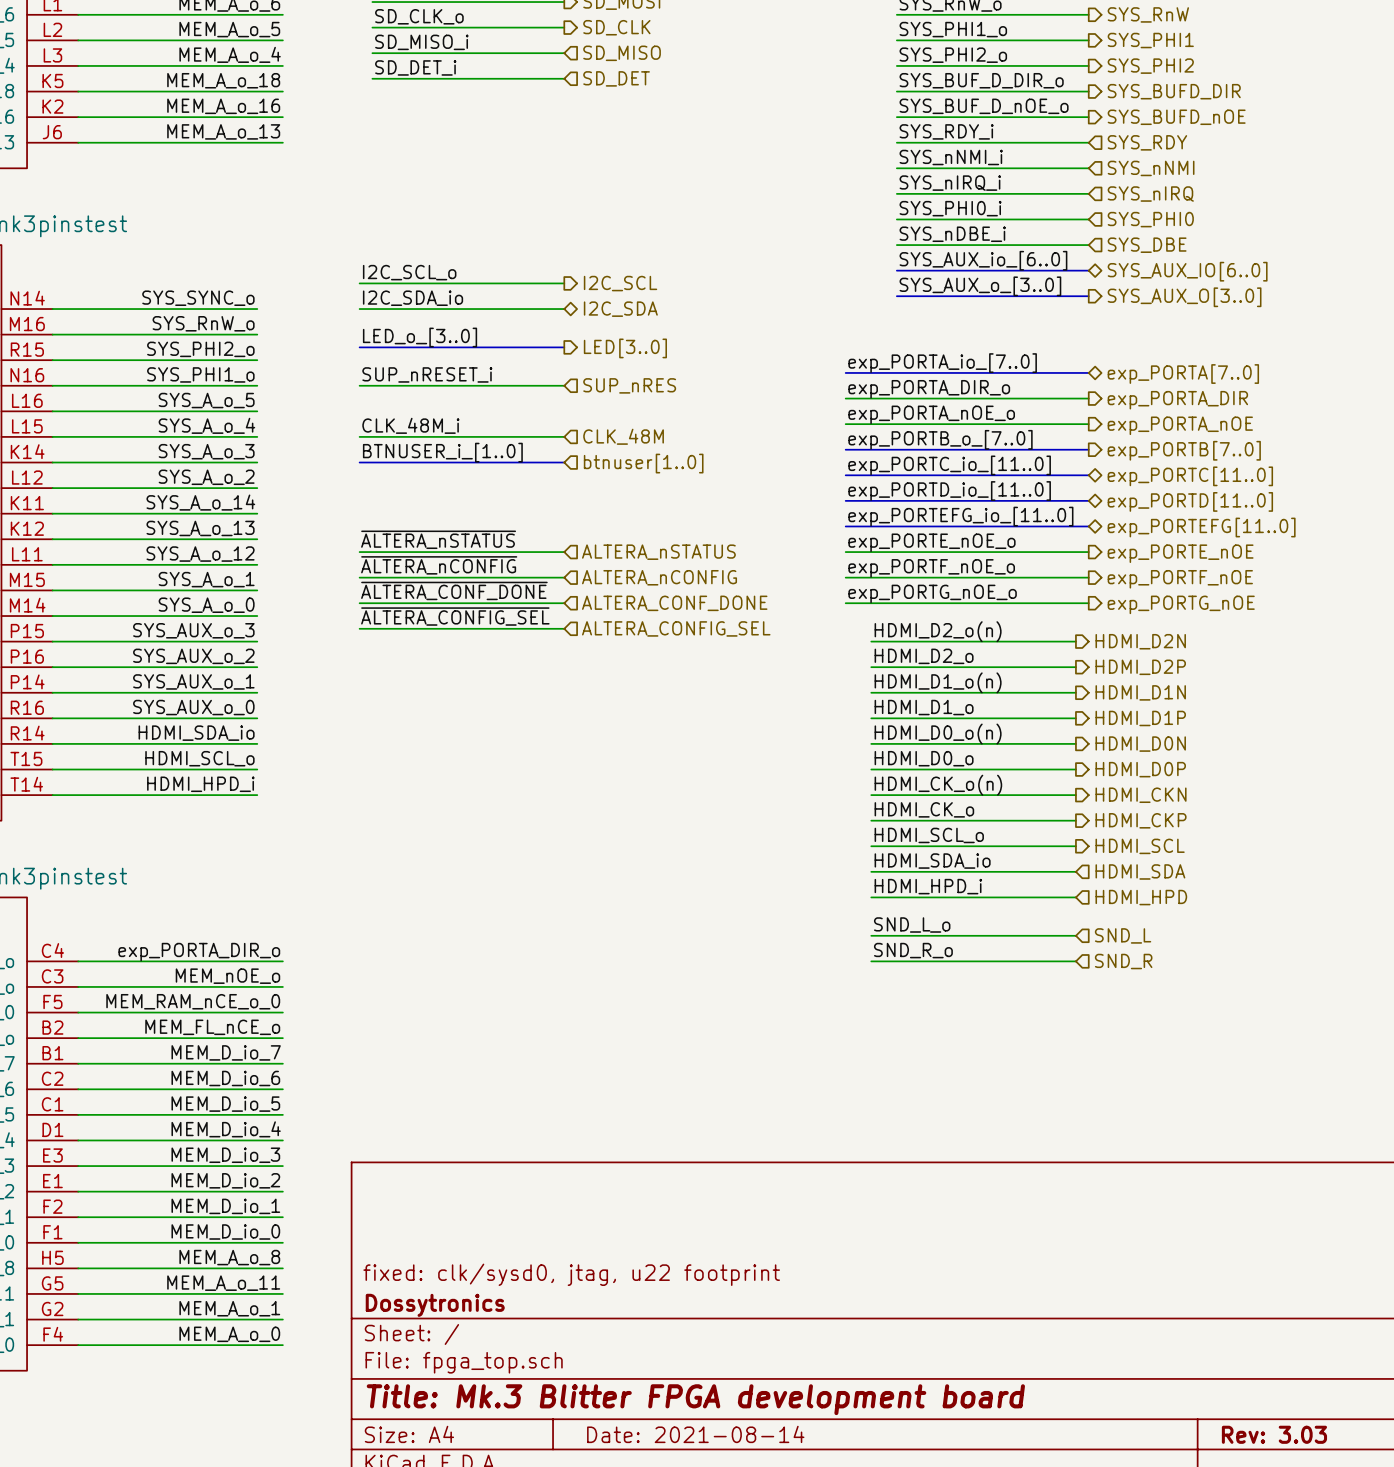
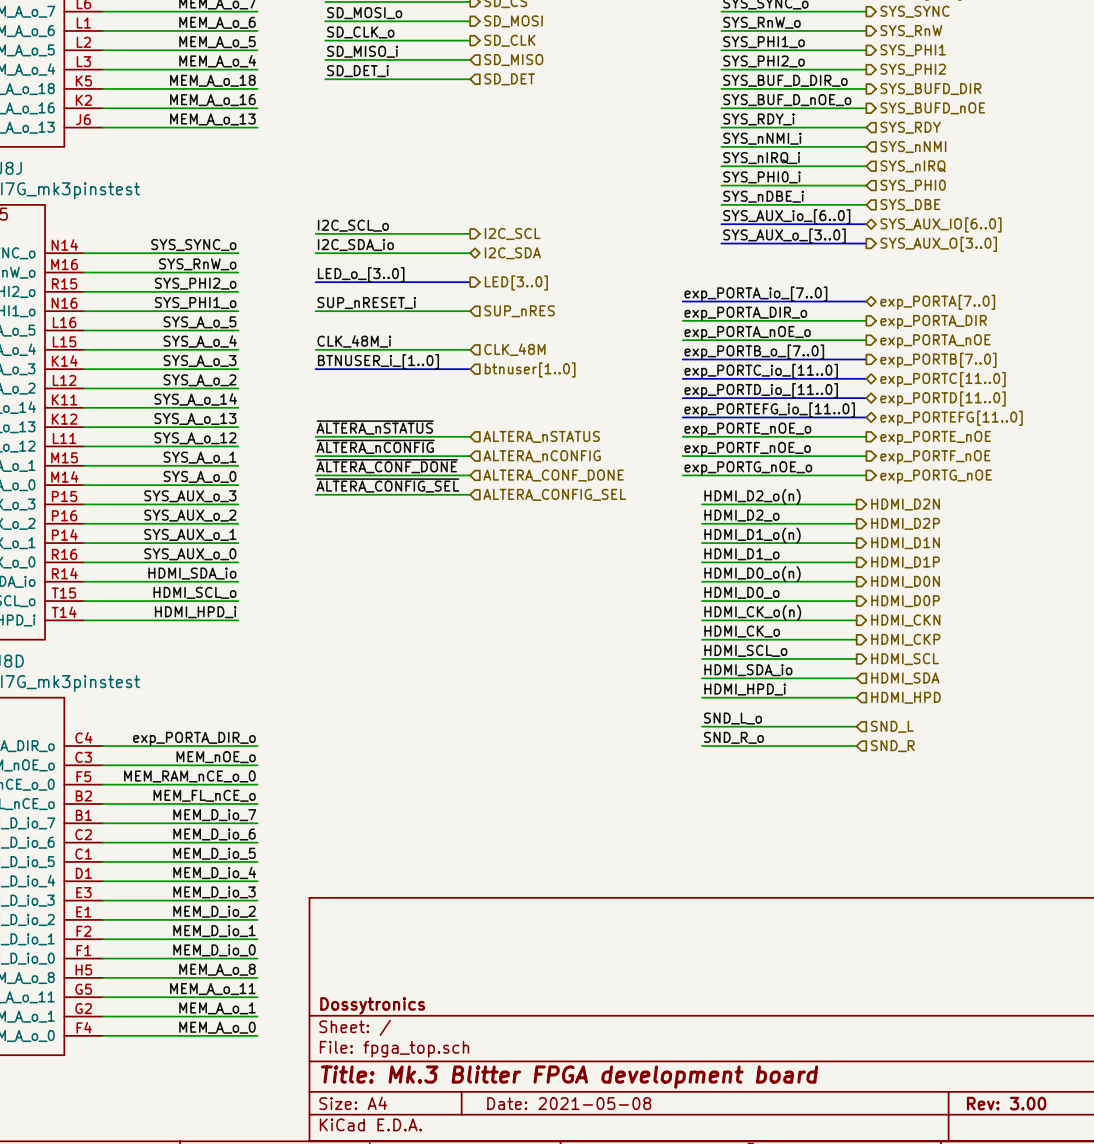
title block: fixed: clk/sysd0, jtag, u22 footprint (571, 1274) -> none
title block: Date: 2021-08-14 (695, 1434) -> Date: 2021-05-08 (569, 1103)
title block: Rev: 3.03 (1274, 1434) -> Rev: 3.00 (1006, 1103)

